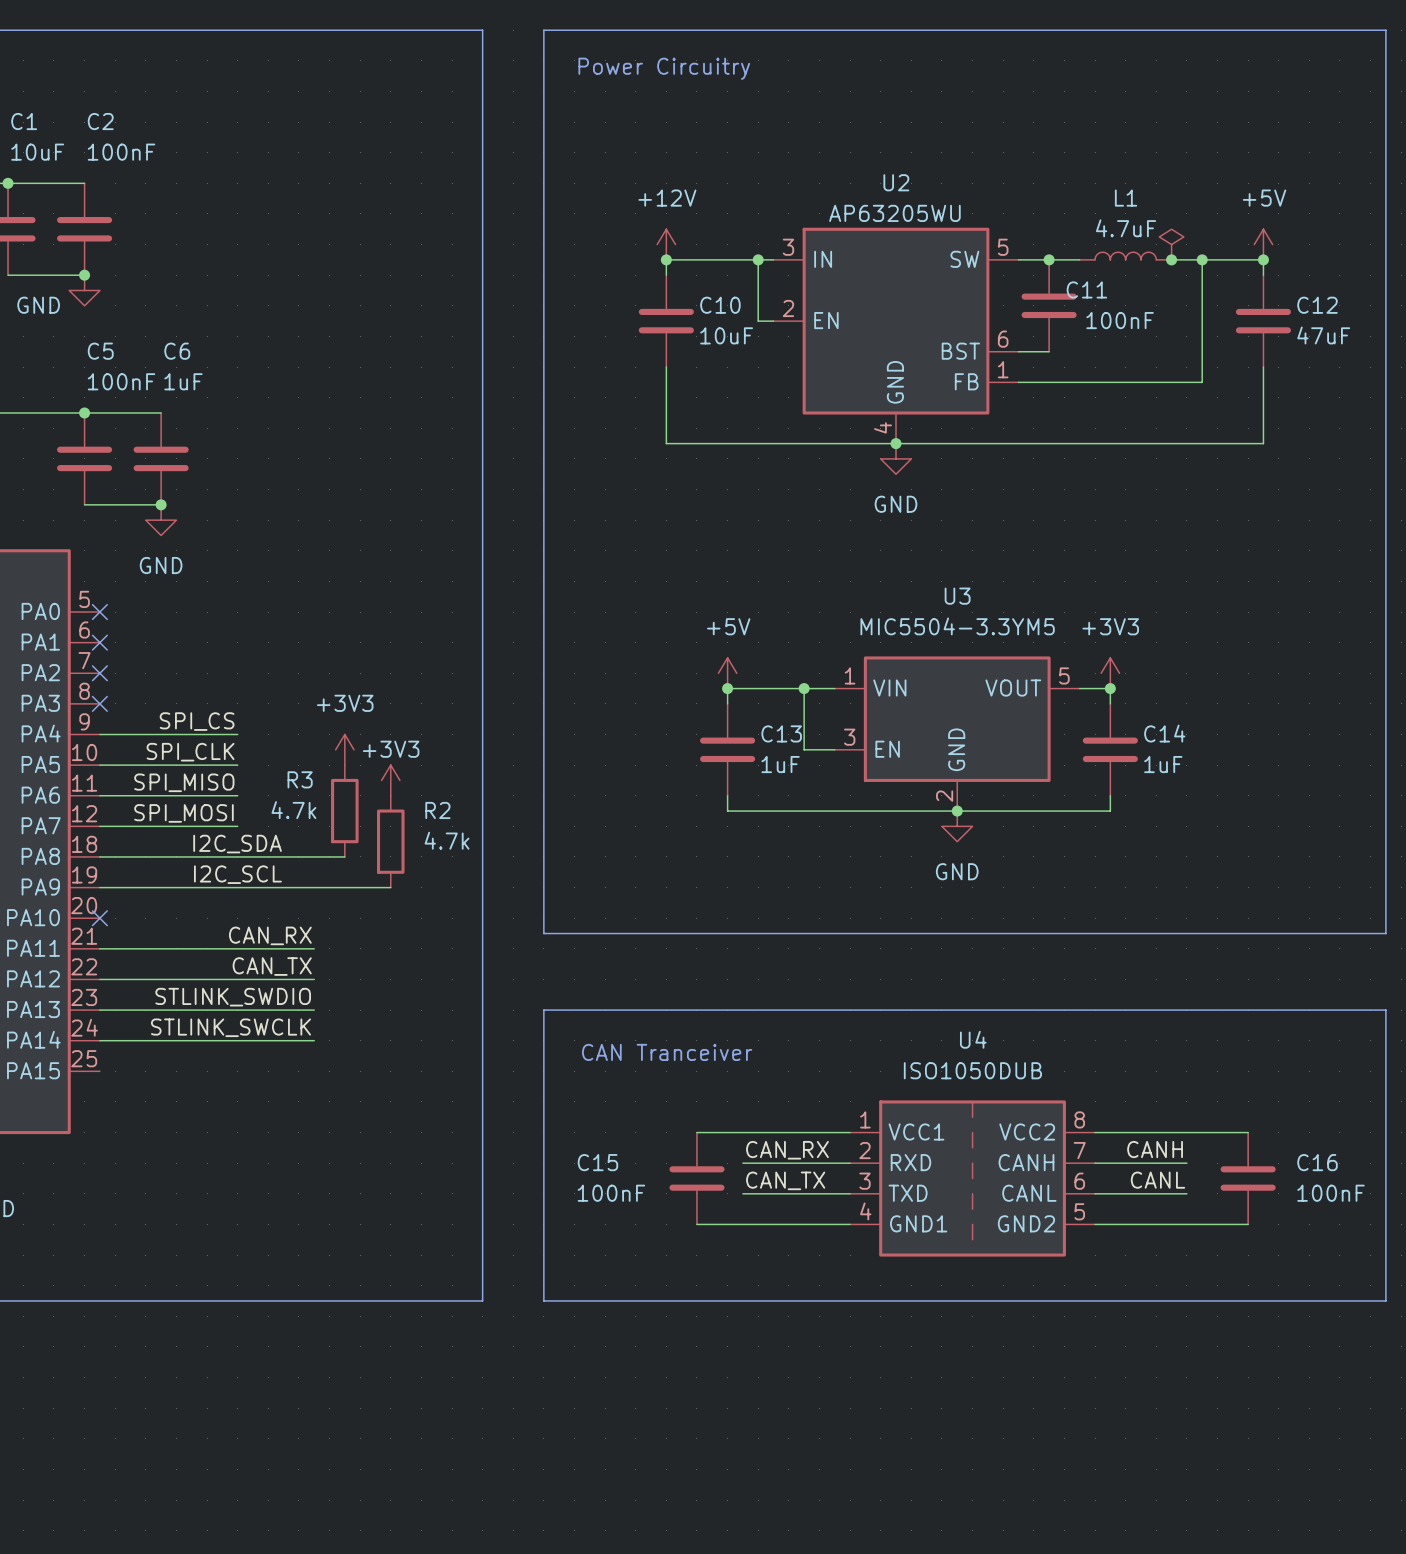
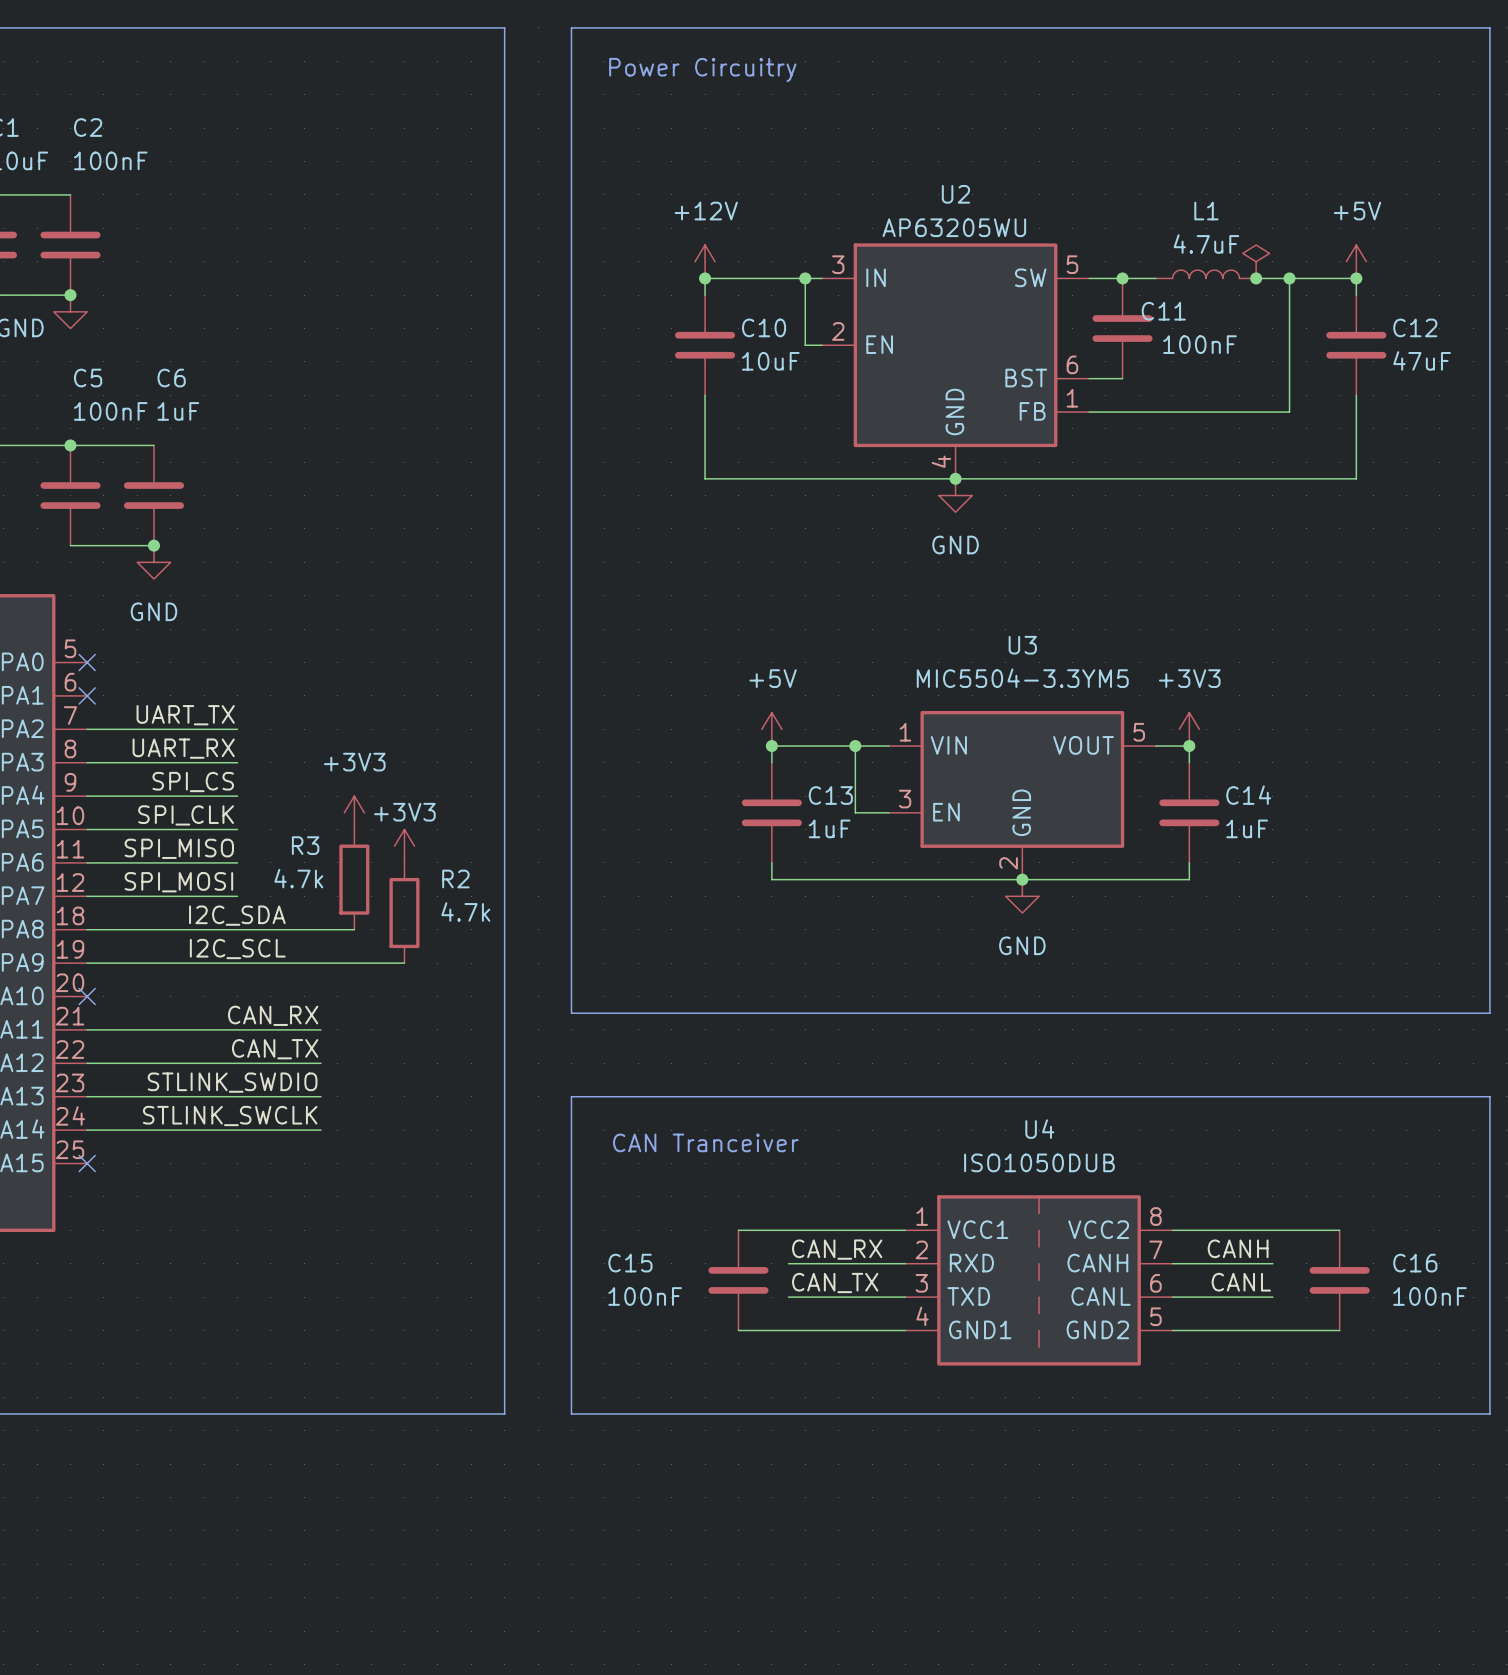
label: none -> UART_TX (185, 715)
wire: none -> (87, 729) (237, 729)
no-connect mark: (99, 673) -> none
label: none -> UART_RX (183, 748)
wire: none -> (87, 762) (237, 762)
no-connect mark: (99, 703) -> none
no-connect mark: none -> (87, 1163)

